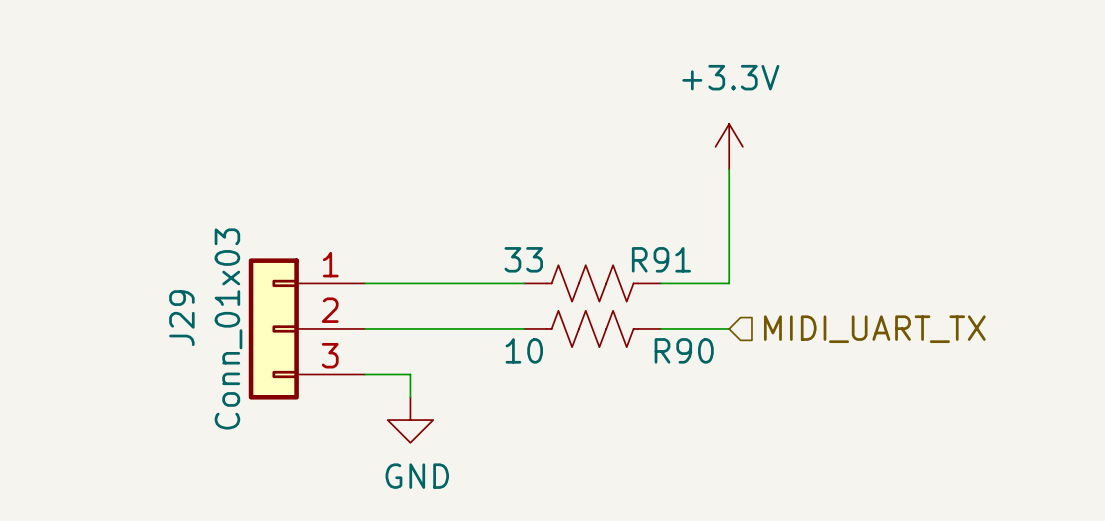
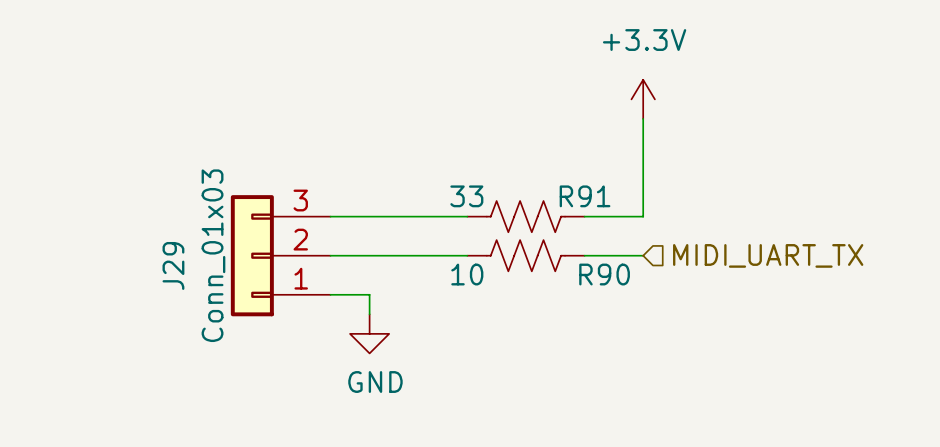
J29 flip: as is (273, 328) -> up-down (252, 255)

